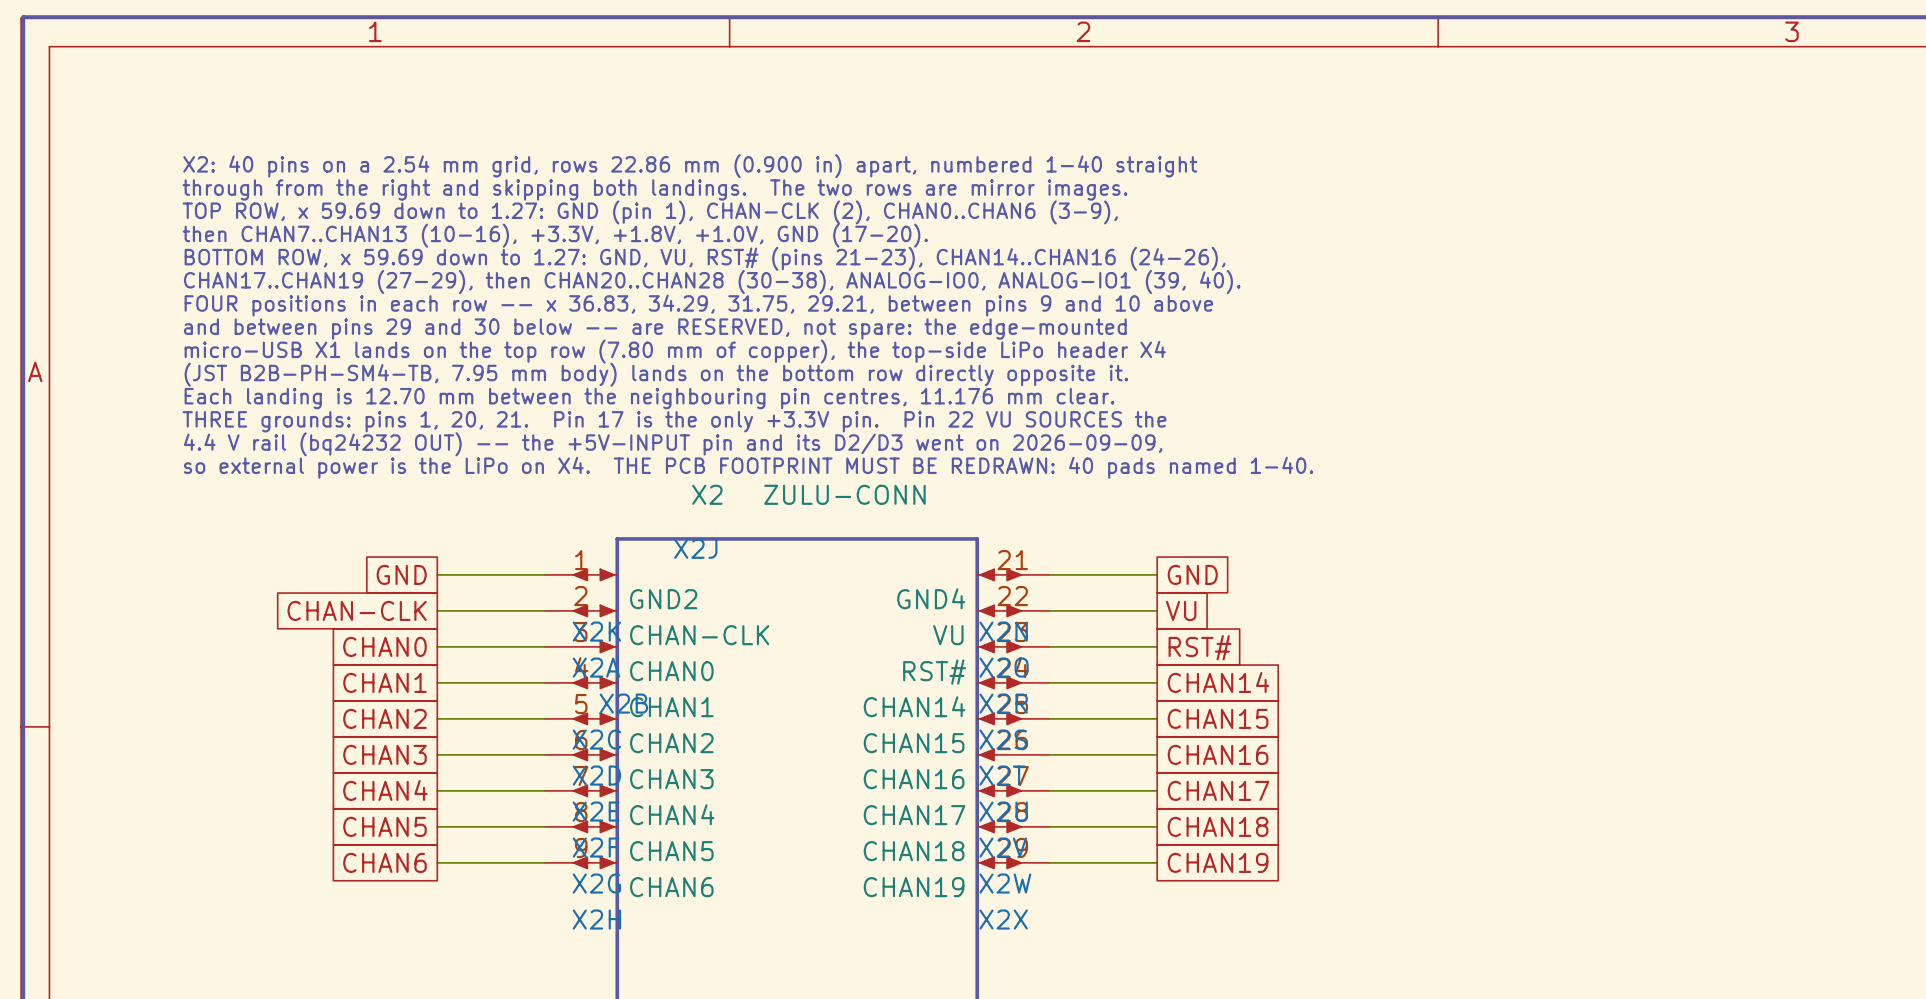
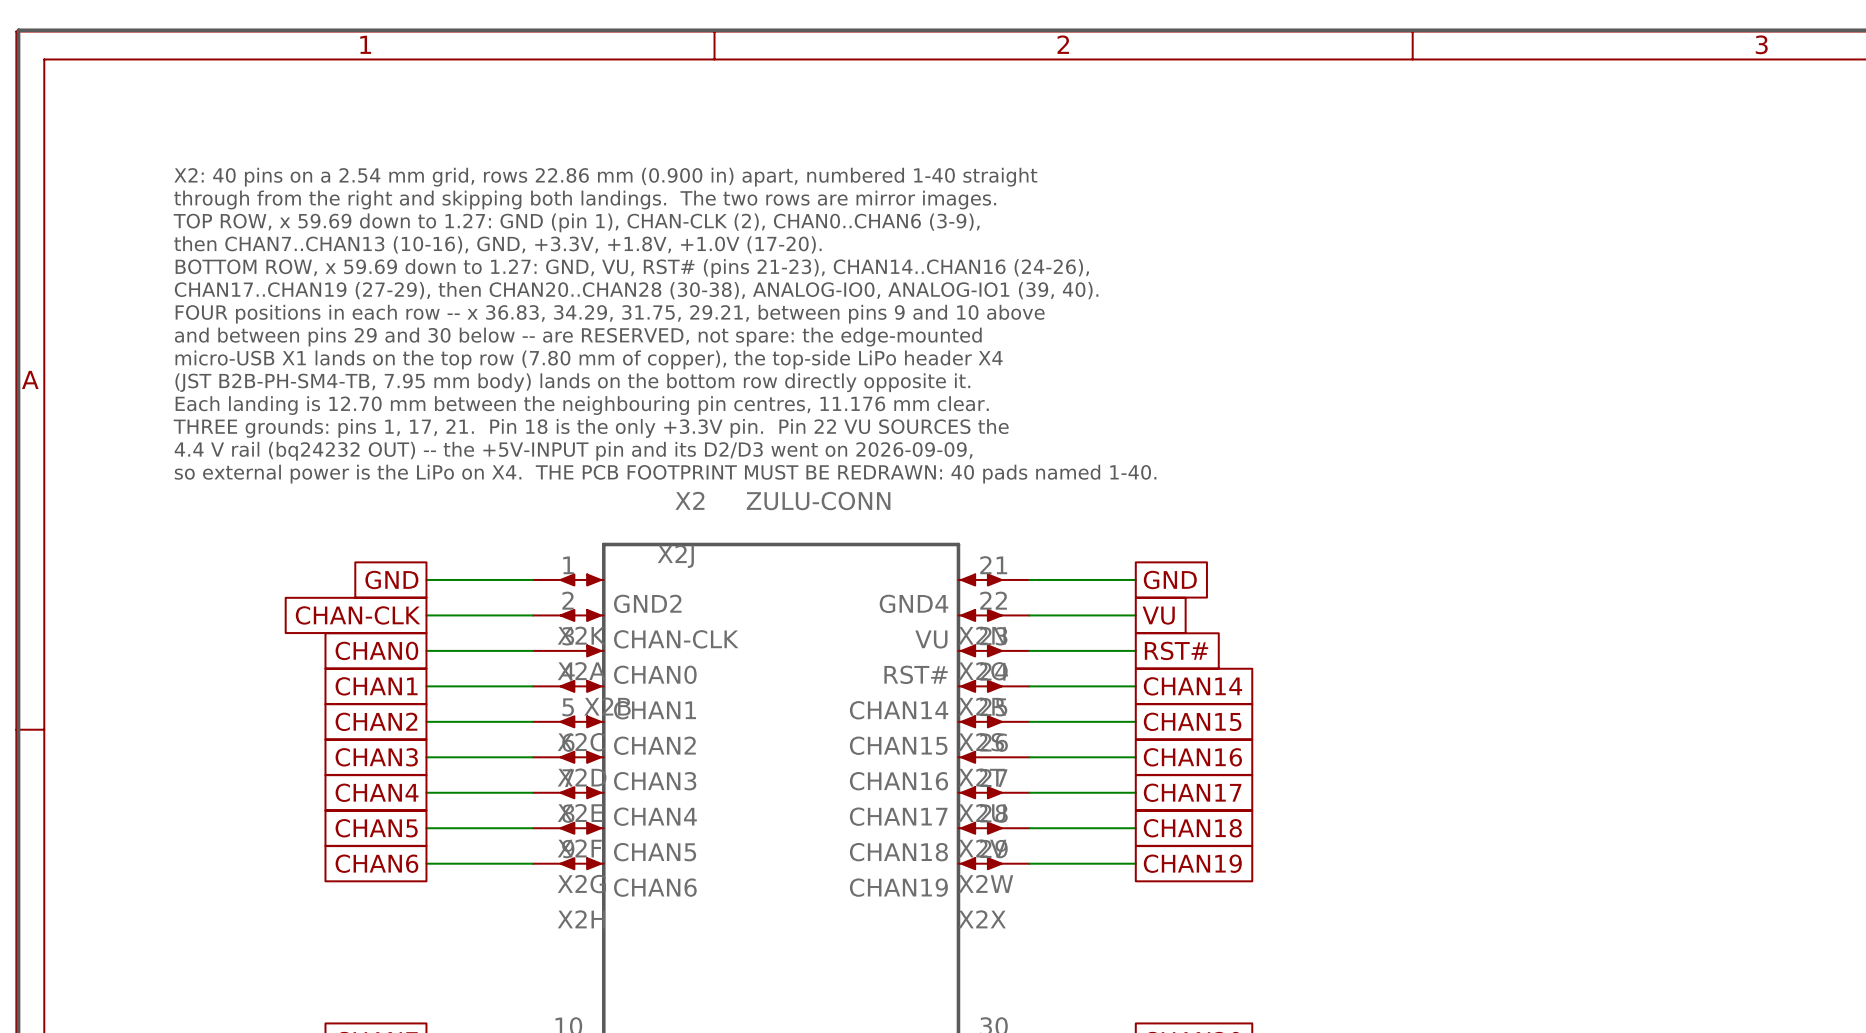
text: then CHAN7..CHAN13 (10-16), +3.3V, +1.8V, +1.0V, GND (17-20). (555, 235) -> then CHAN7..CHAN13 (10-16), GND, +3.3V, +1.8V, +1.0V (17-20). (497, 244)
text: THREE grounds: pins 1, 20, 21. Pin 17 is the only +3.3V pin. Pin 22 VU SOURCES the (674, 421) -> THREE grounds: pins 1, 17, 21. Pin 18 is the only +3.3V pin. Pin 22 VU SOURCES the (591, 428)

